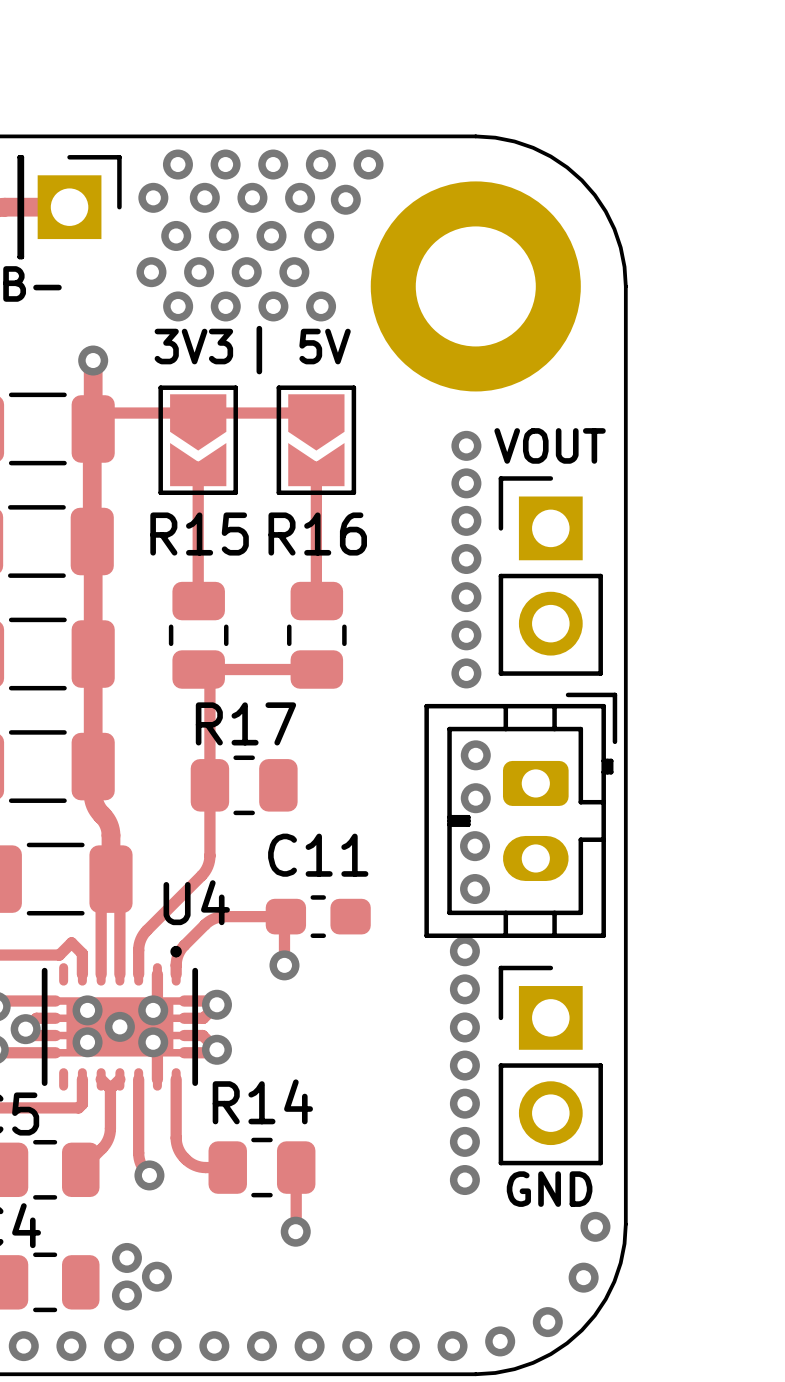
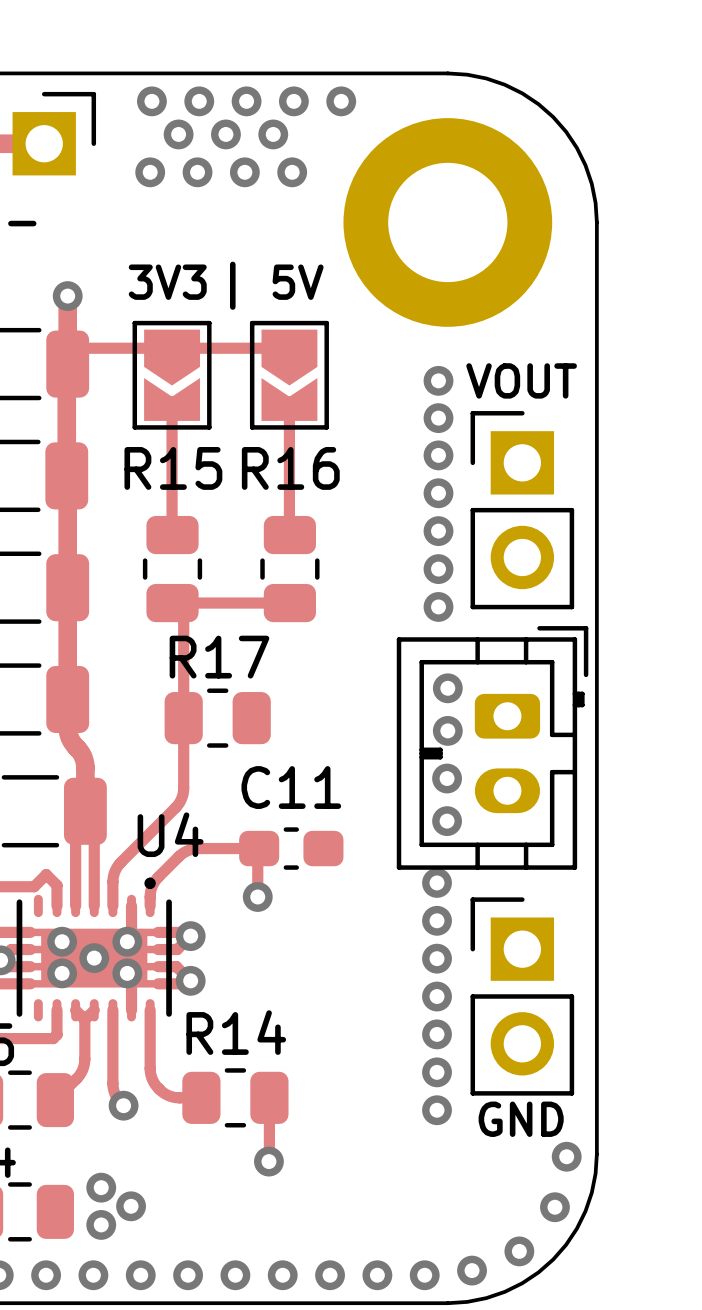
via: (153, 197) -> none
via: (345, 199) -> none
via: (151, 272) -> none
via: (199, 272) -> none
via: (246, 272) -> none
via: (294, 272) -> none
via: (178, 306) -> none
via: (225, 306) -> none
via: (273, 306) -> none
via: (321, 306) -> none

